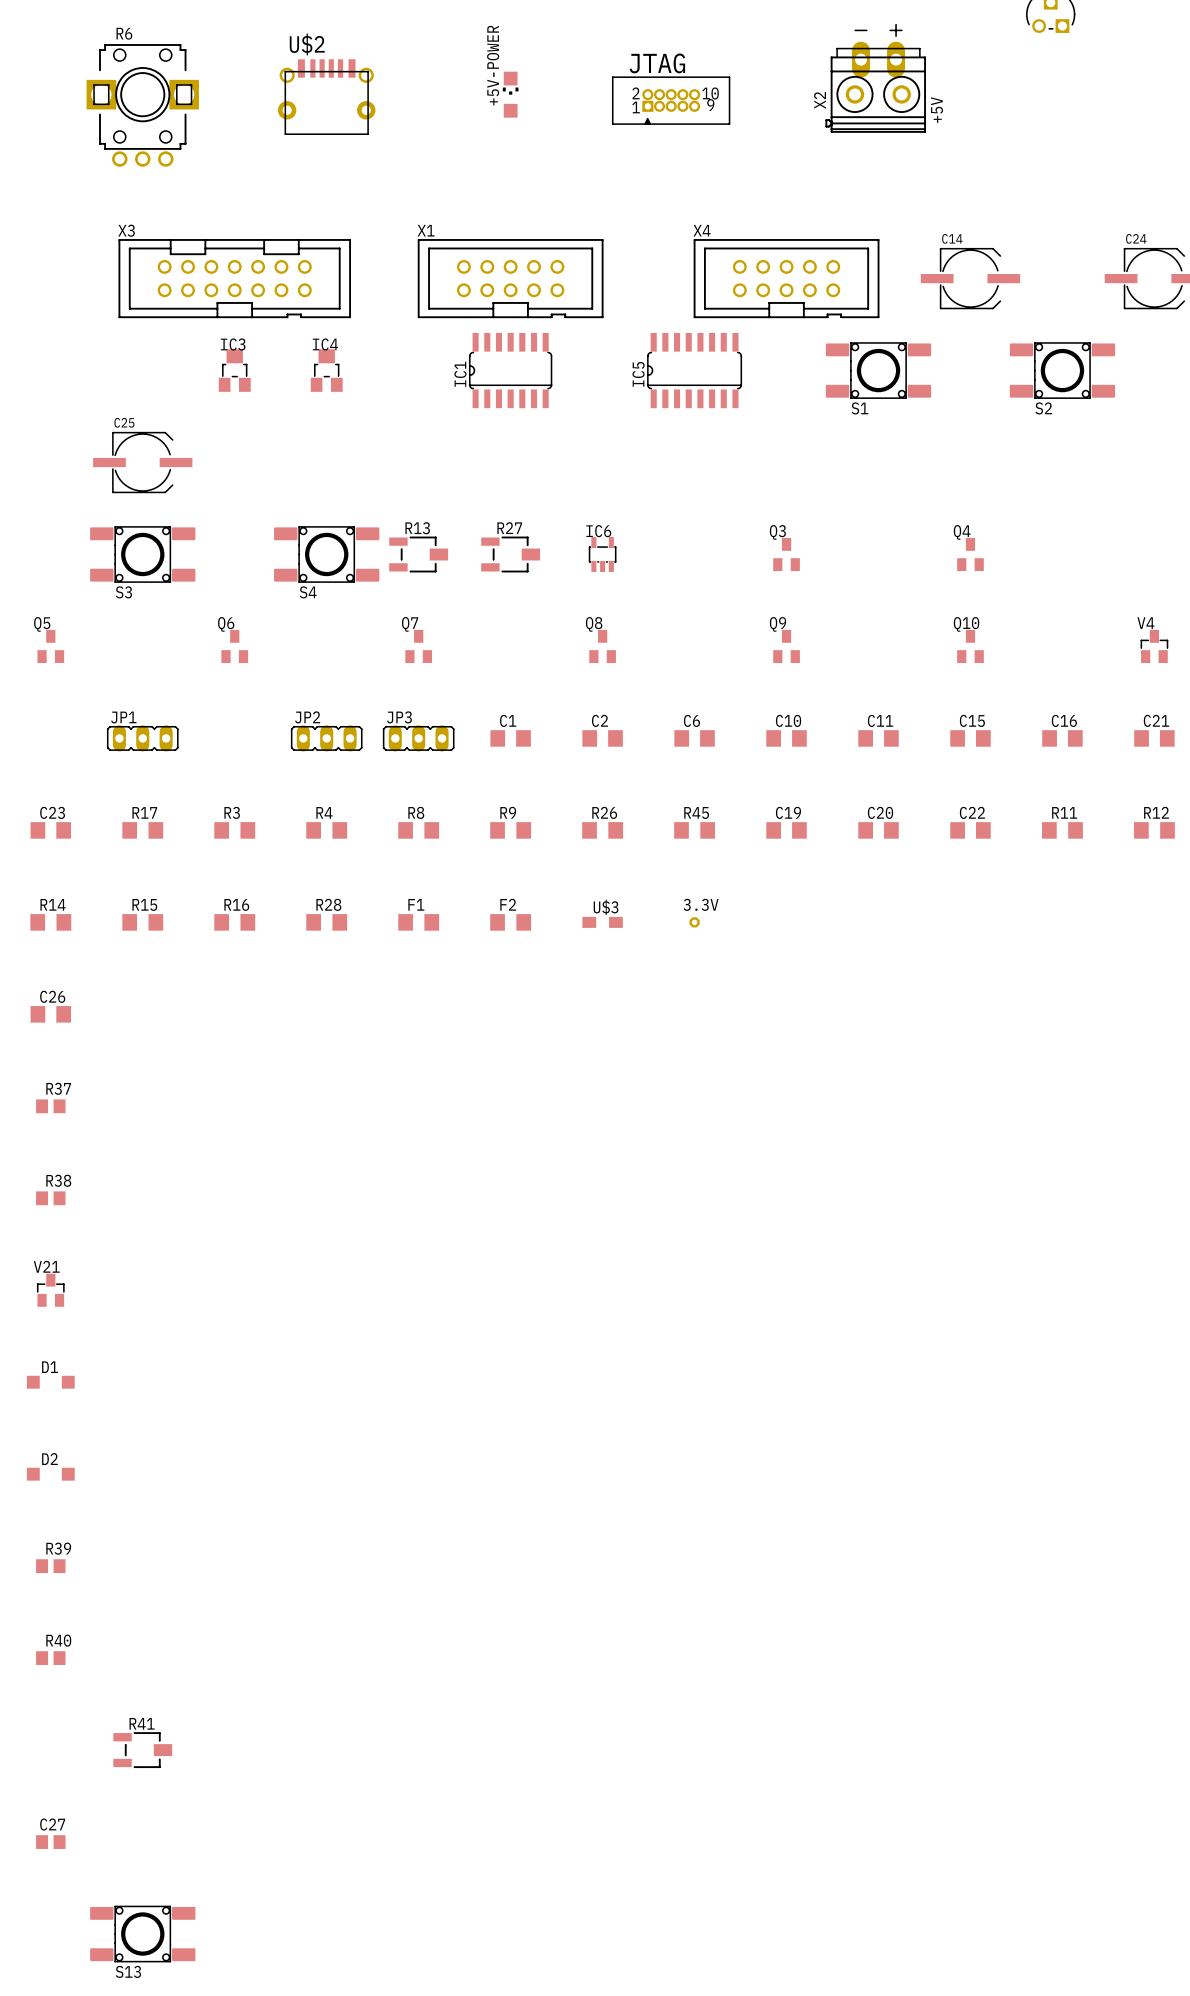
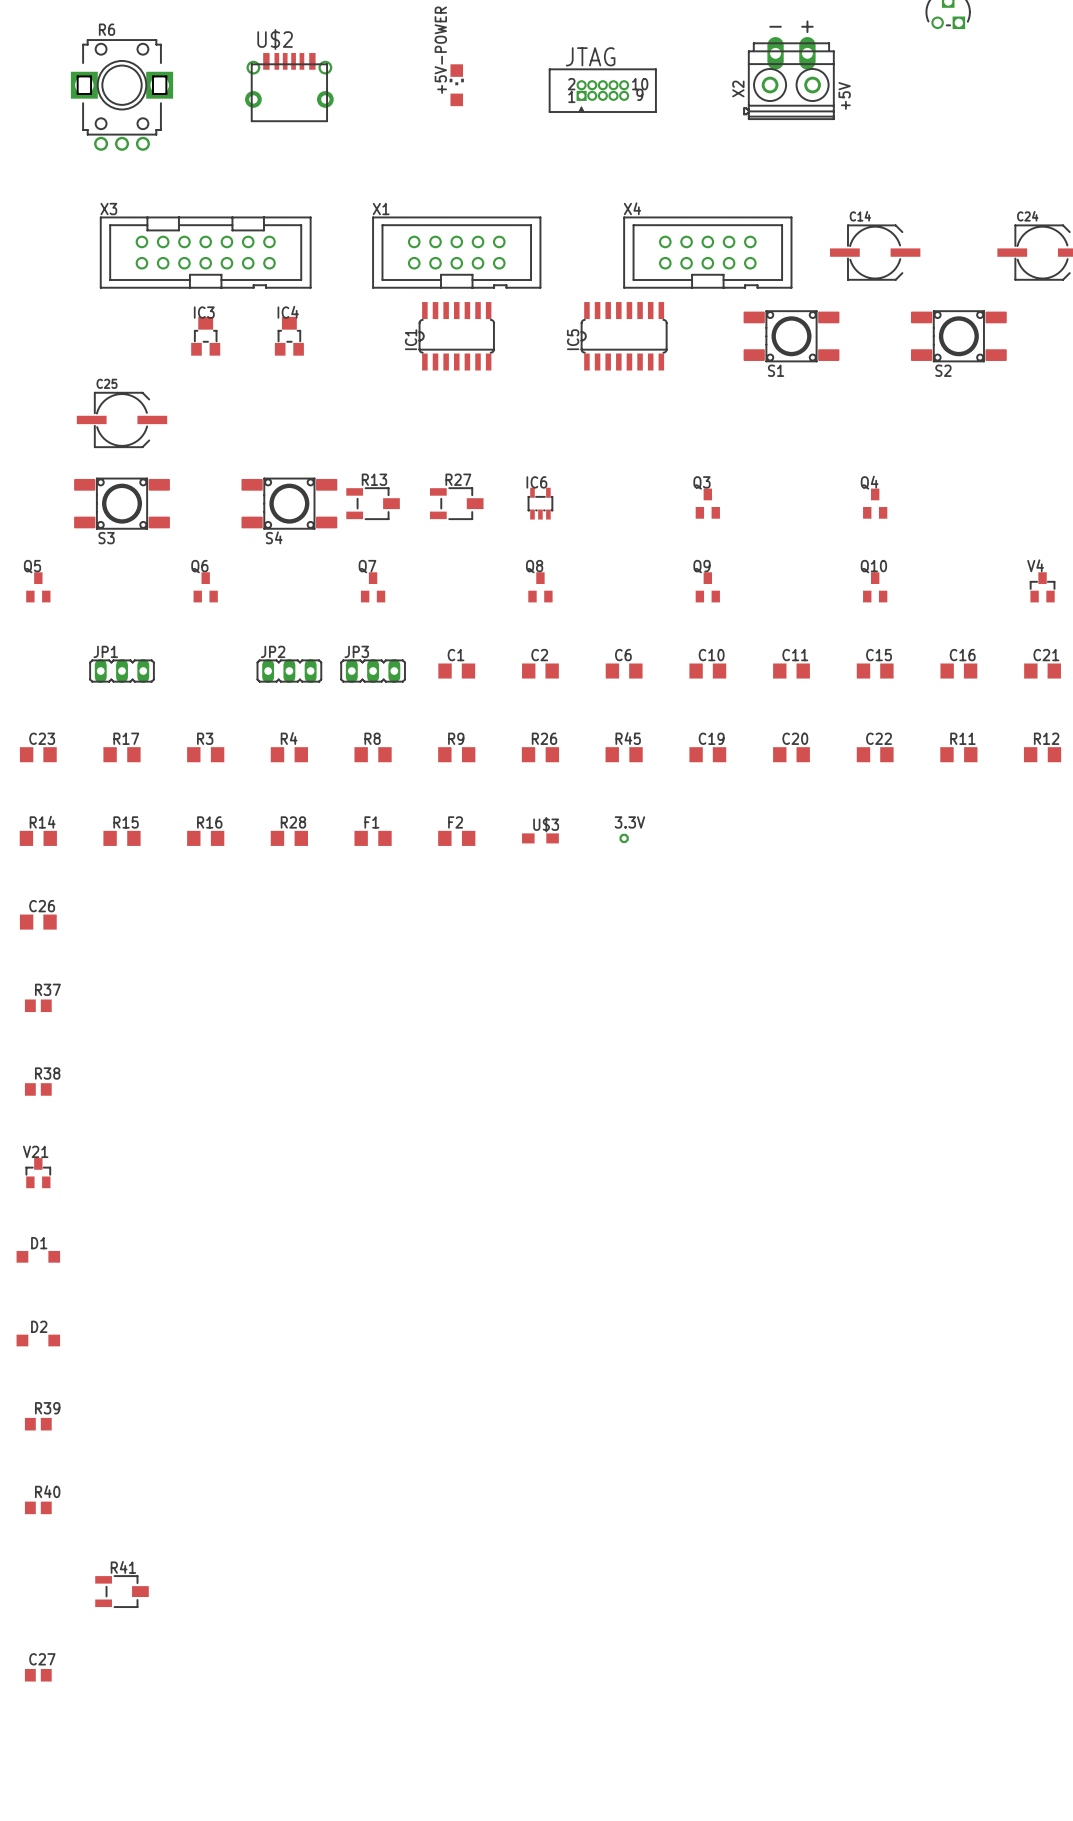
S13: (142, 1934) -> none

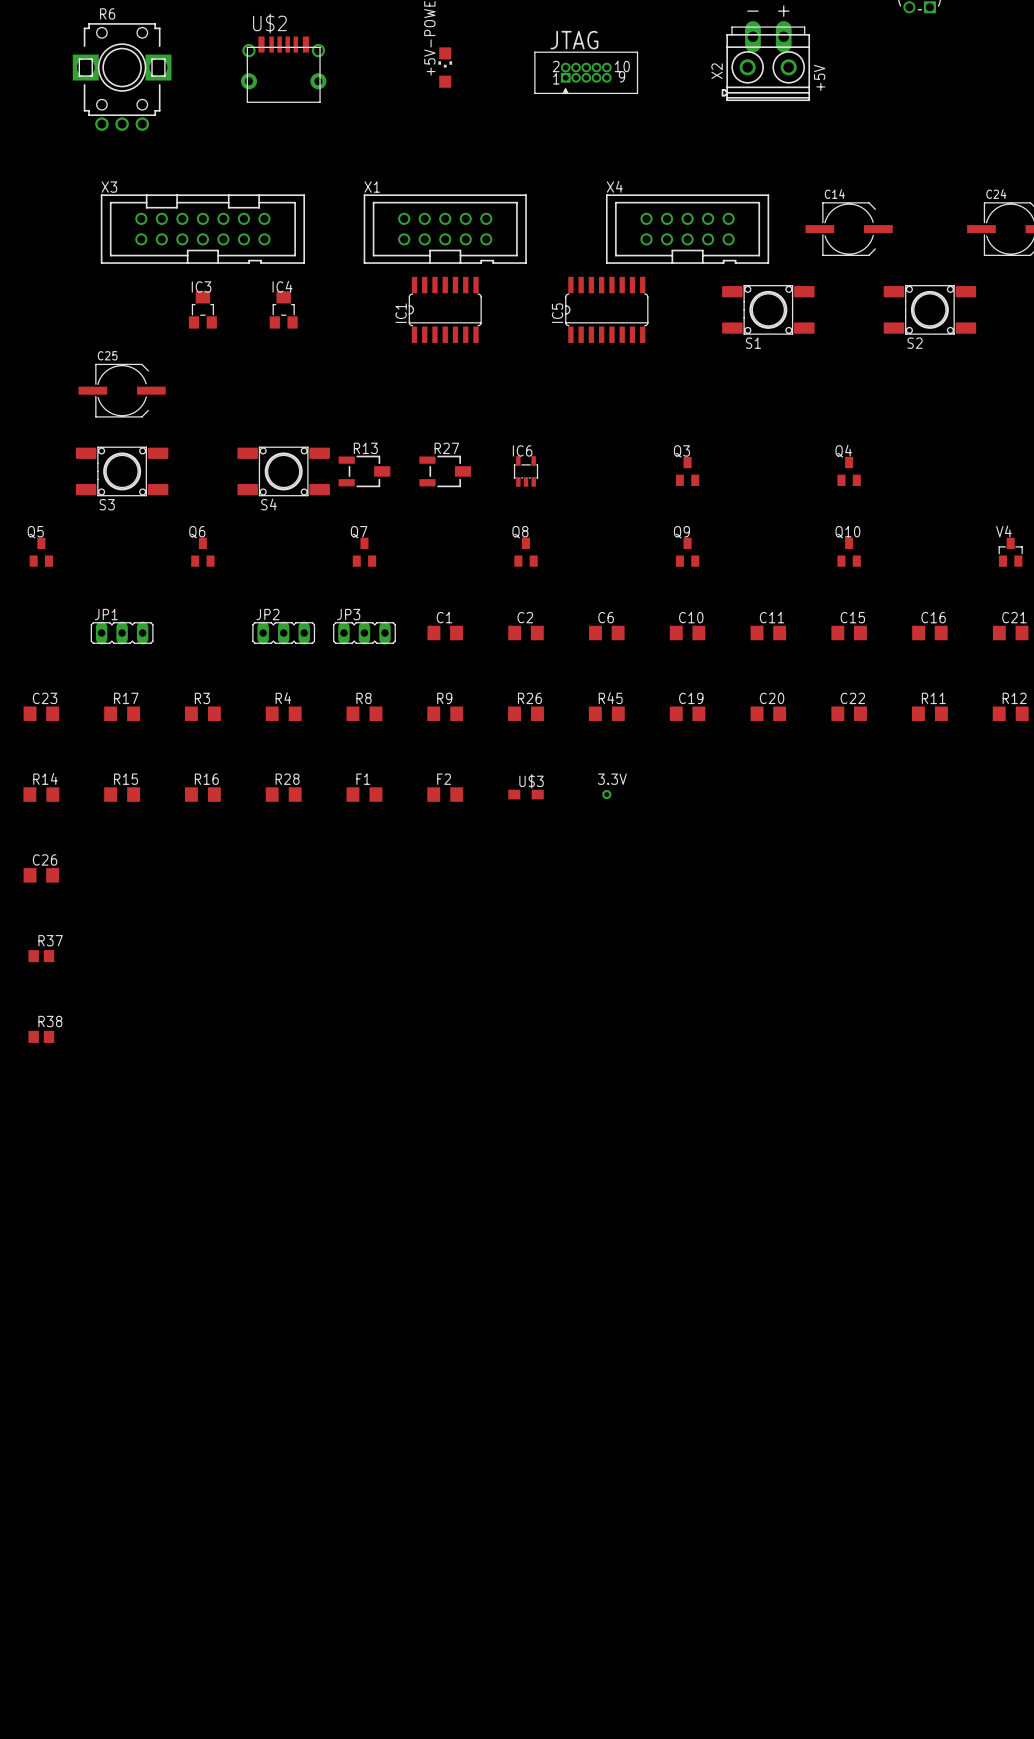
V21: (38, 1173) -> none
D1: (38, 1256) -> none
D2: (38, 1340) -> none
R39: (38, 1424) -> none
R40: (38, 1507) -> none
R41: (122, 1591) -> none
C27: (38, 1675) -> none

